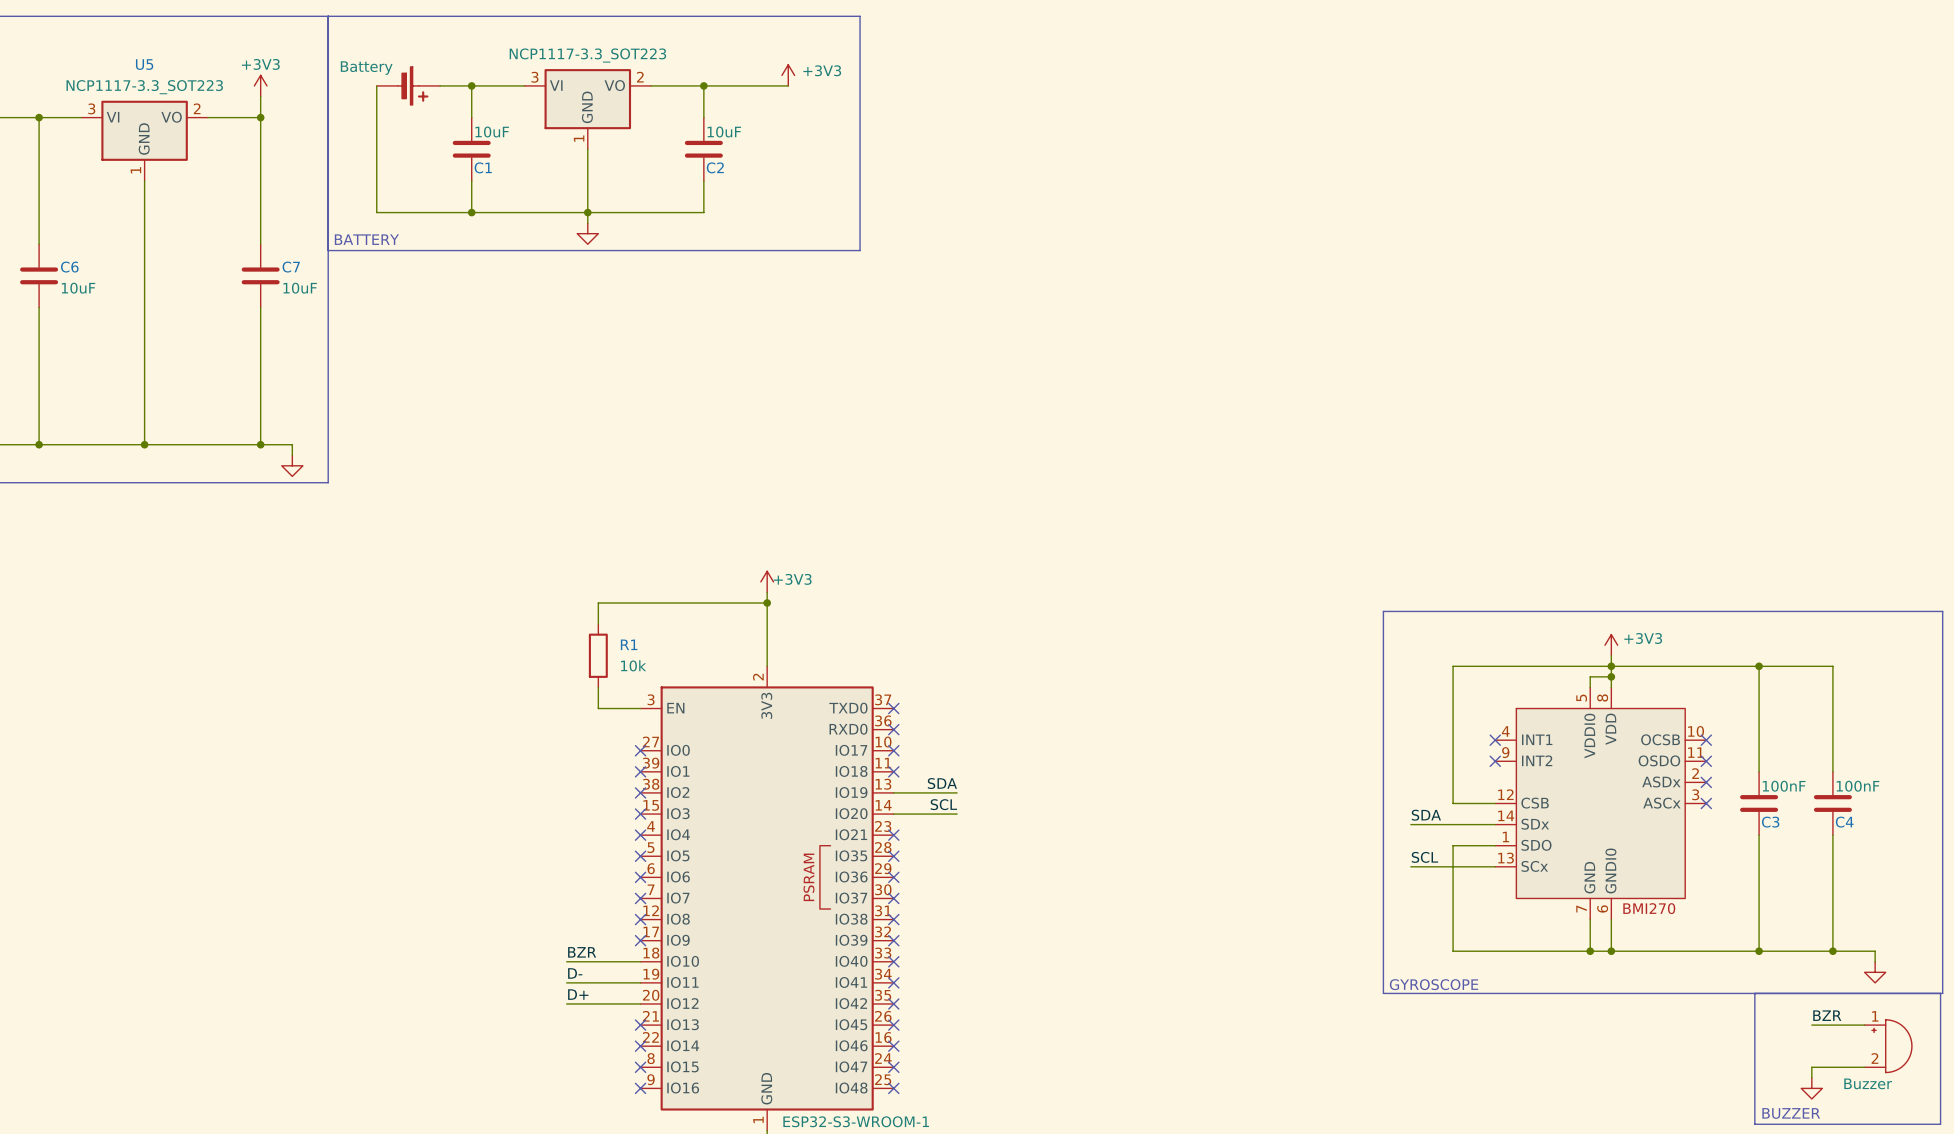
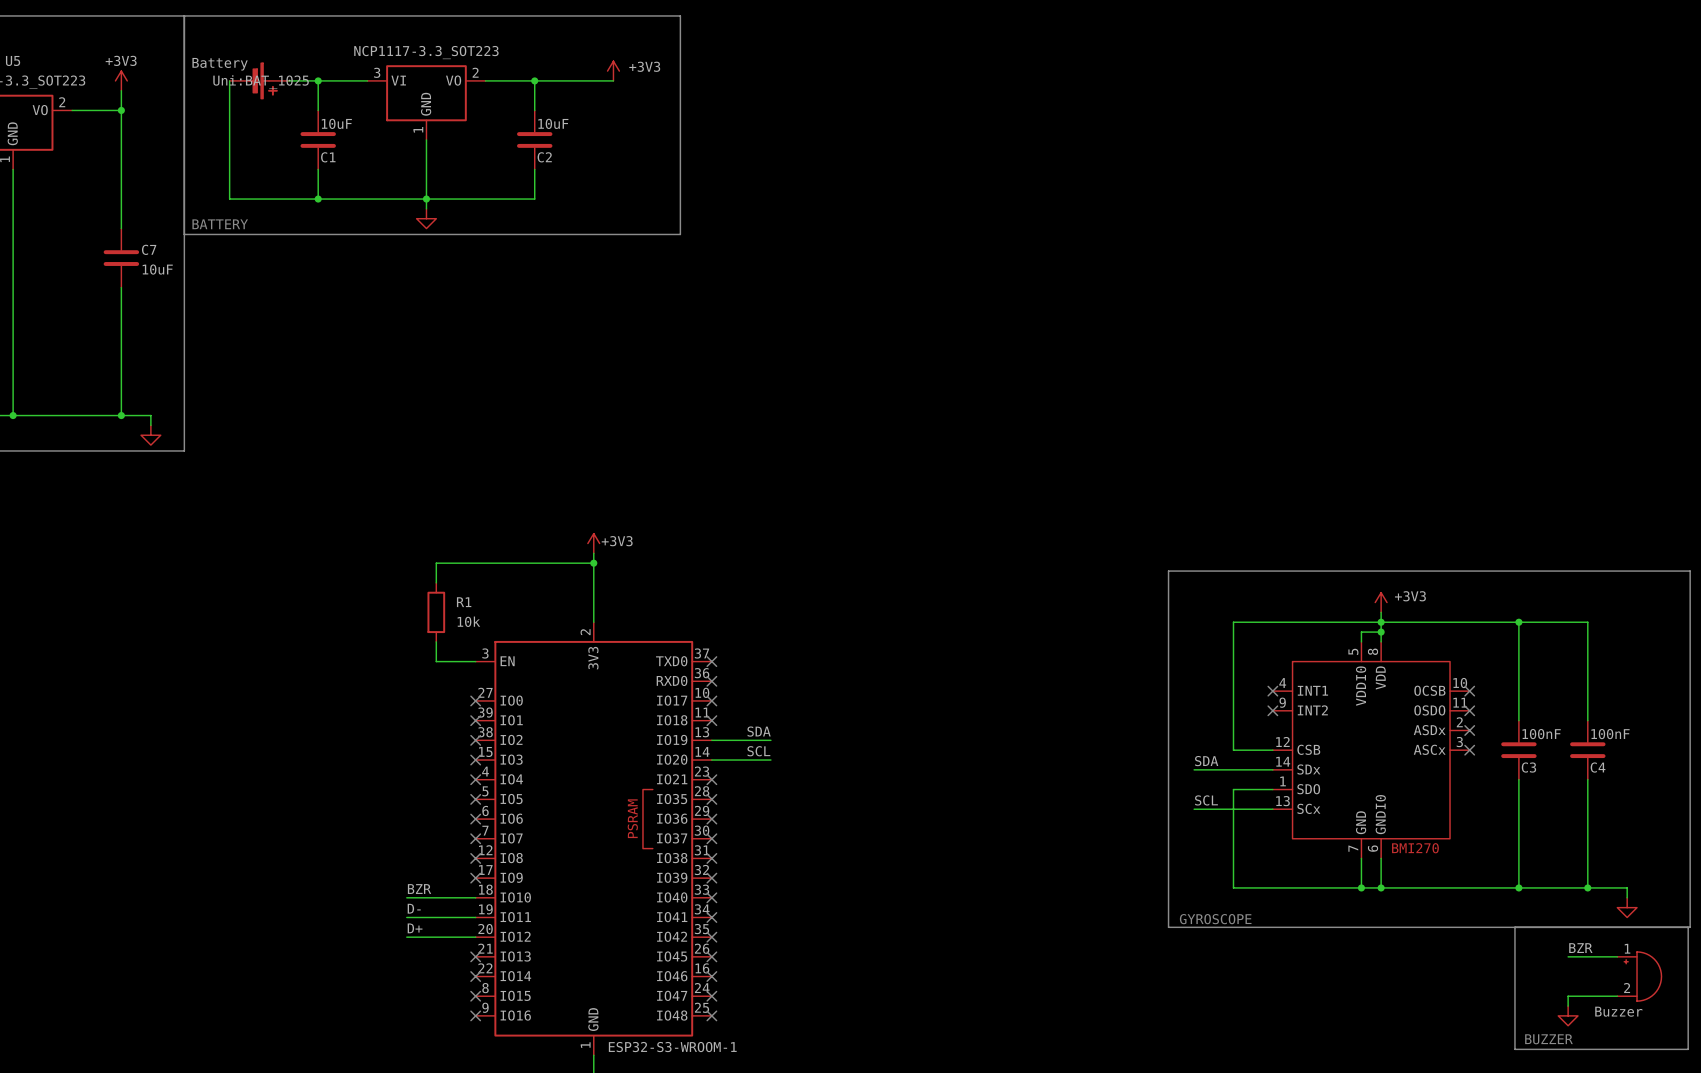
part text: none -> Uni:BAT_1025 (261, 81)

